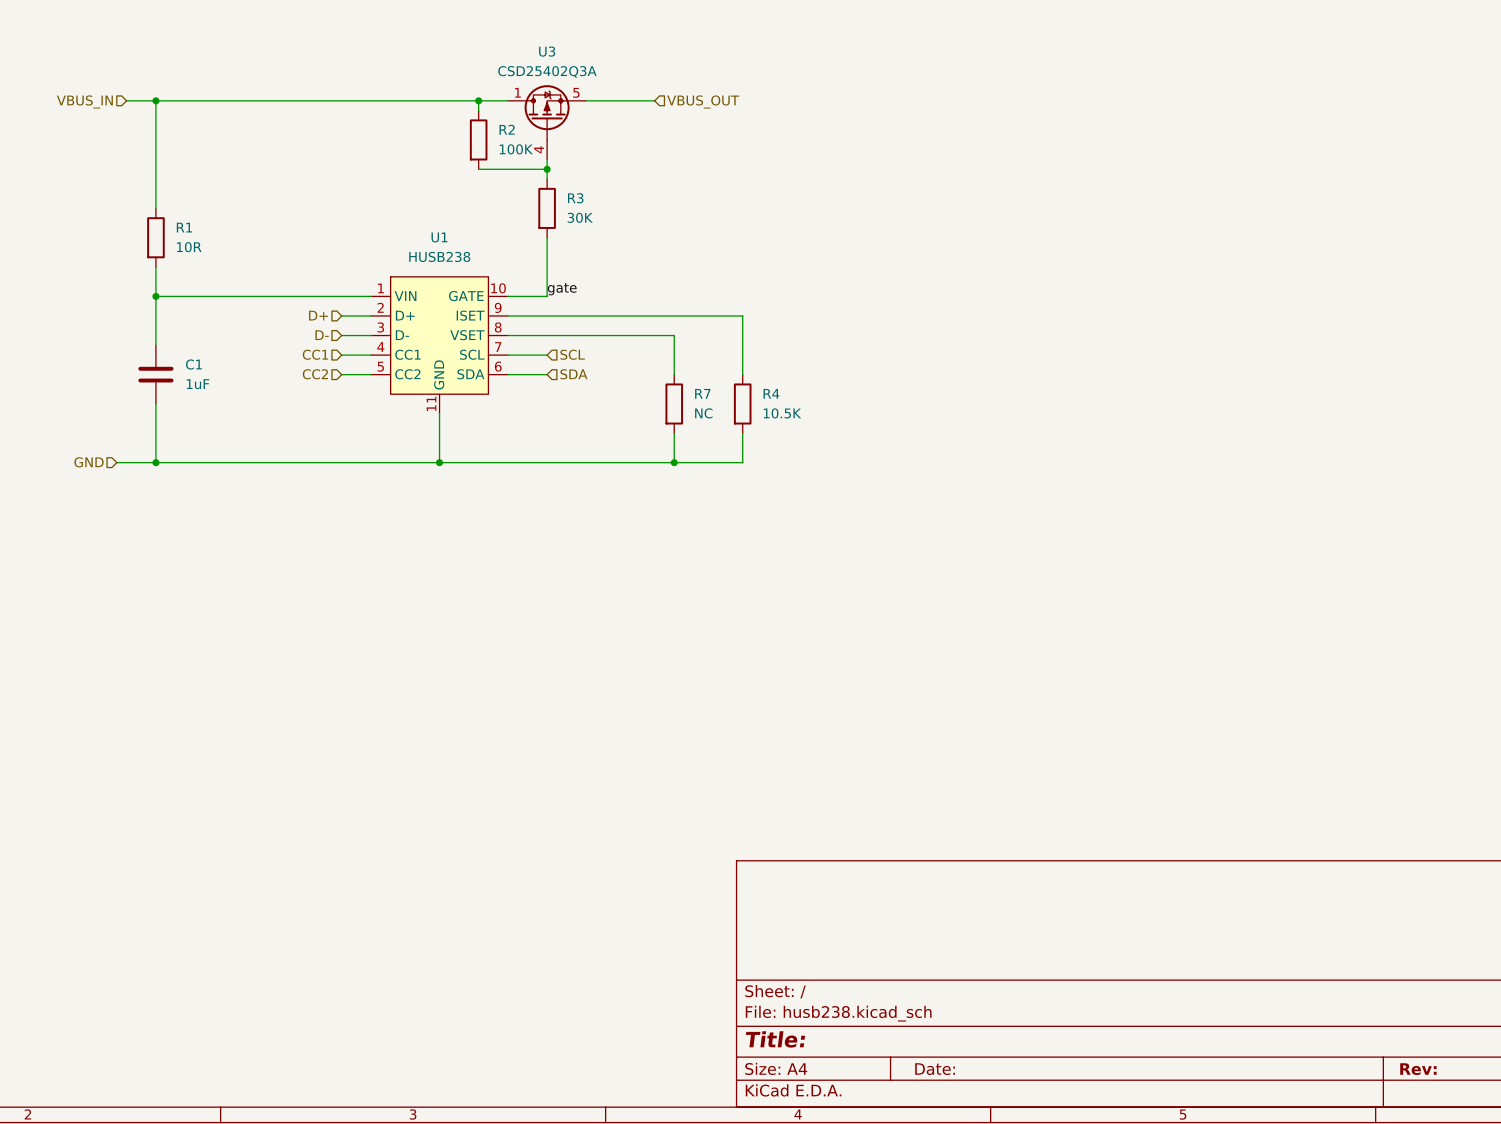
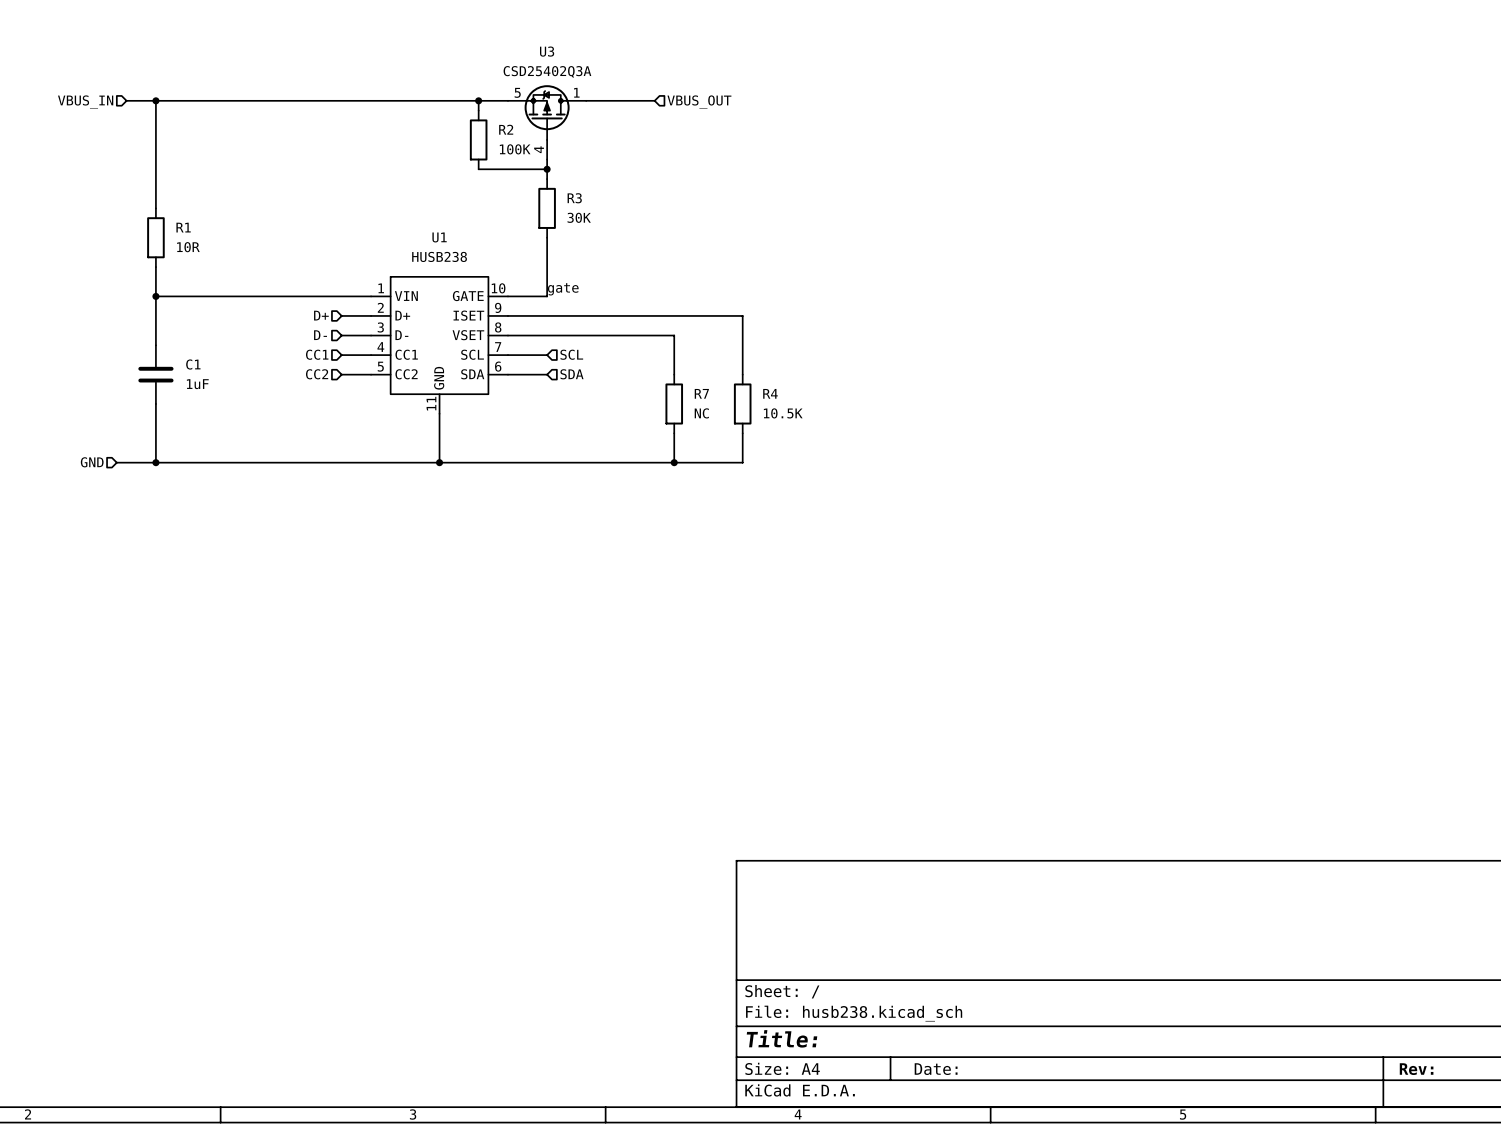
U3 flip: as is (547, 112) -> left-right (547, 112)

